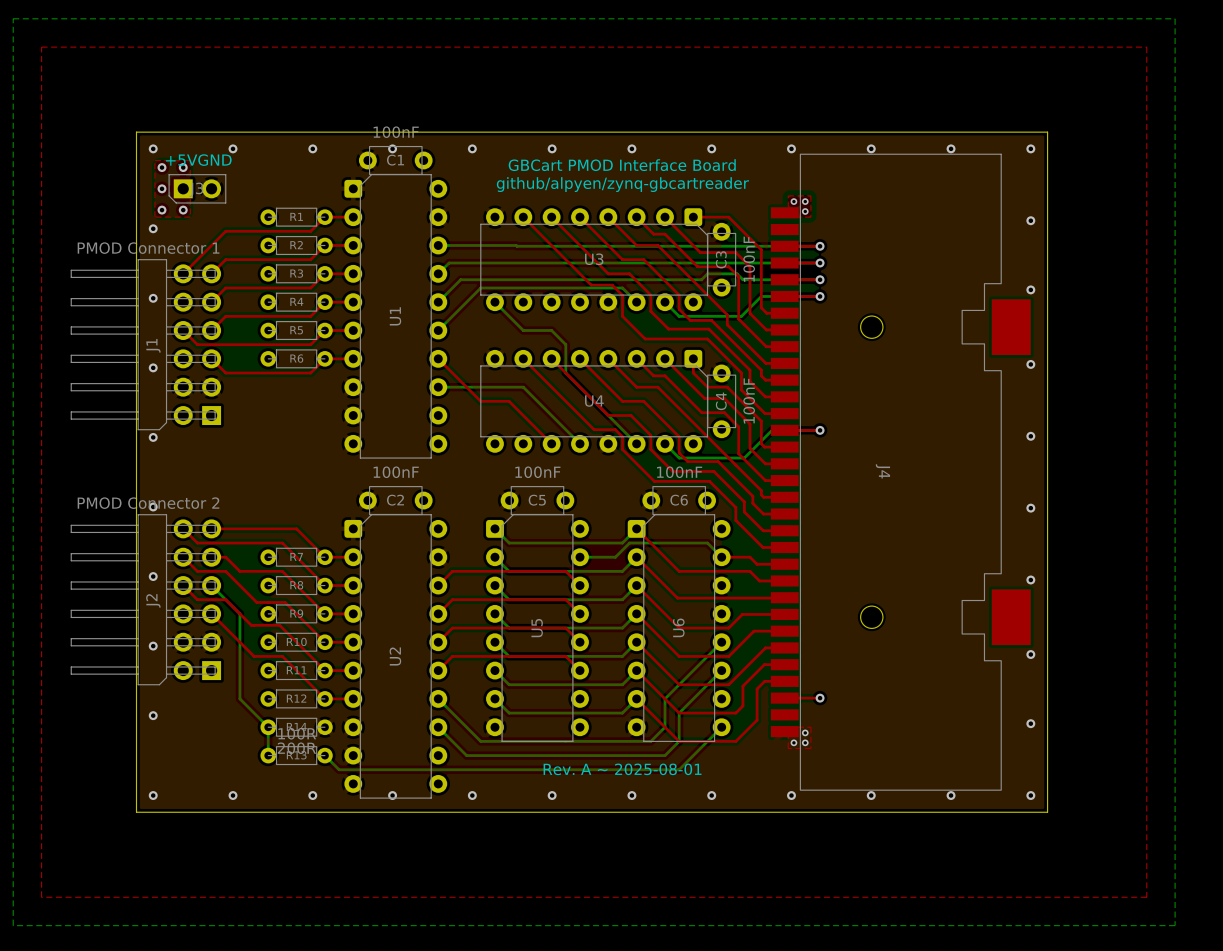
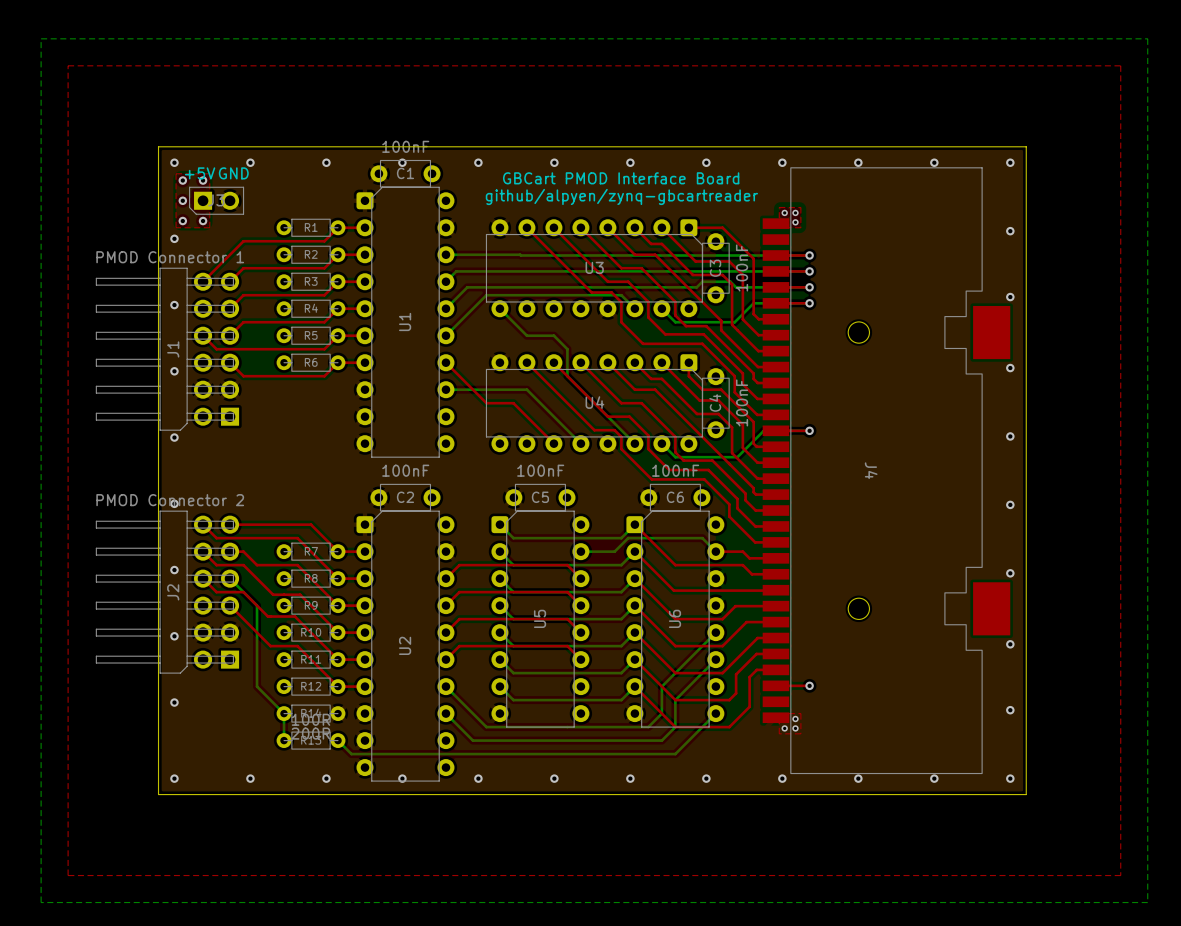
text: Rev. A ~ 2025-08-01 (622, 769) -> none

